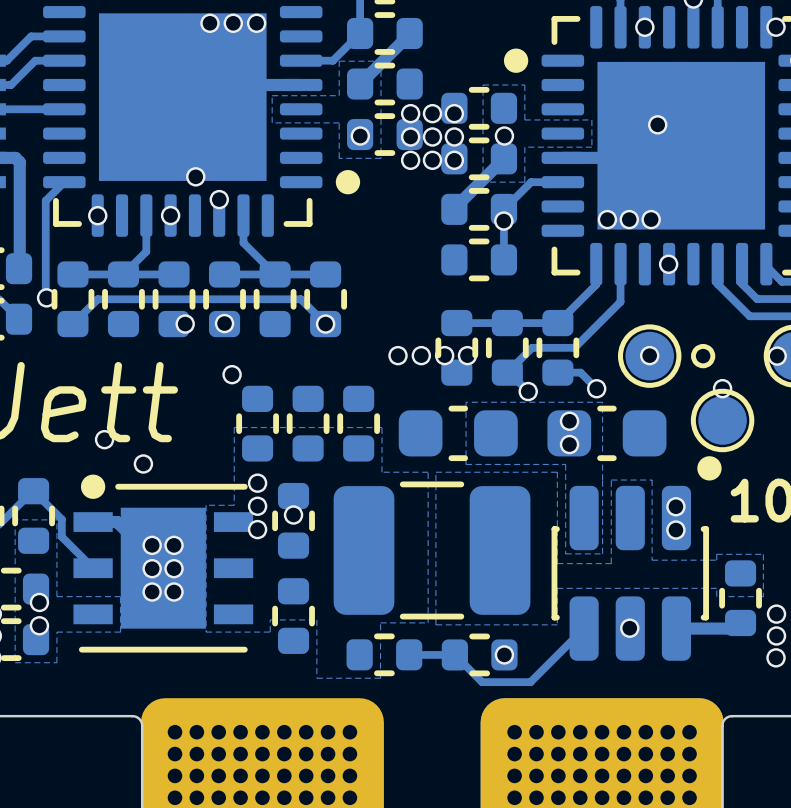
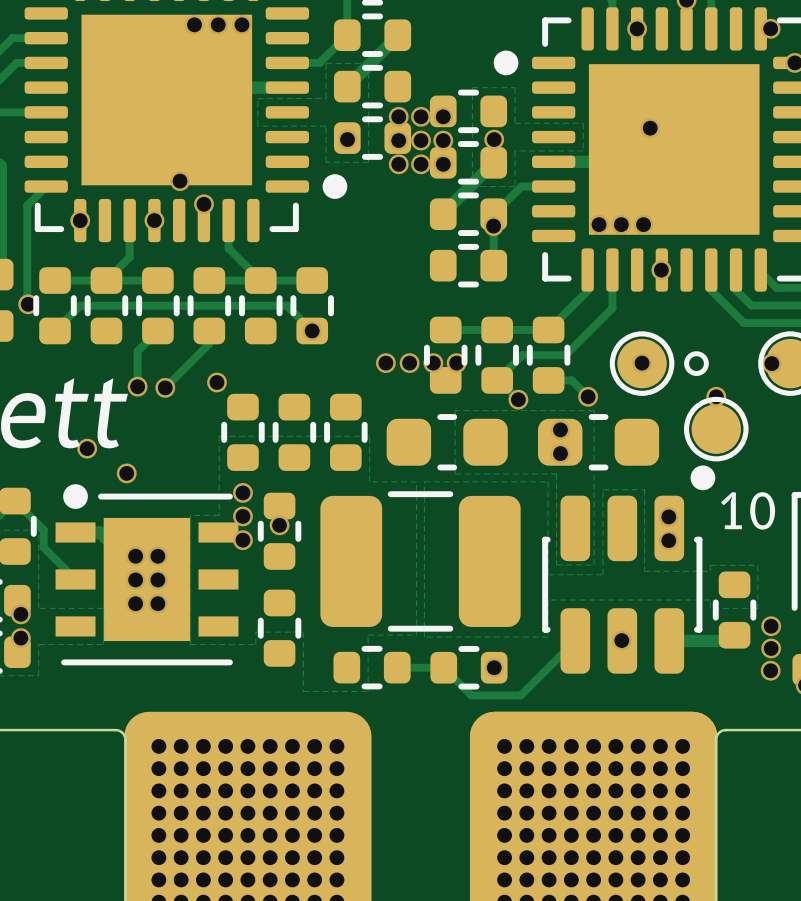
via: (224, 323) -> none
track: none -> (157, 330) (137, 351) (137, 386)
via: (185, 324) -> none
track: none -> (209, 330) (209, 343) (165, 387)
via: none -> (137, 386)
via: none -> (165, 387)

